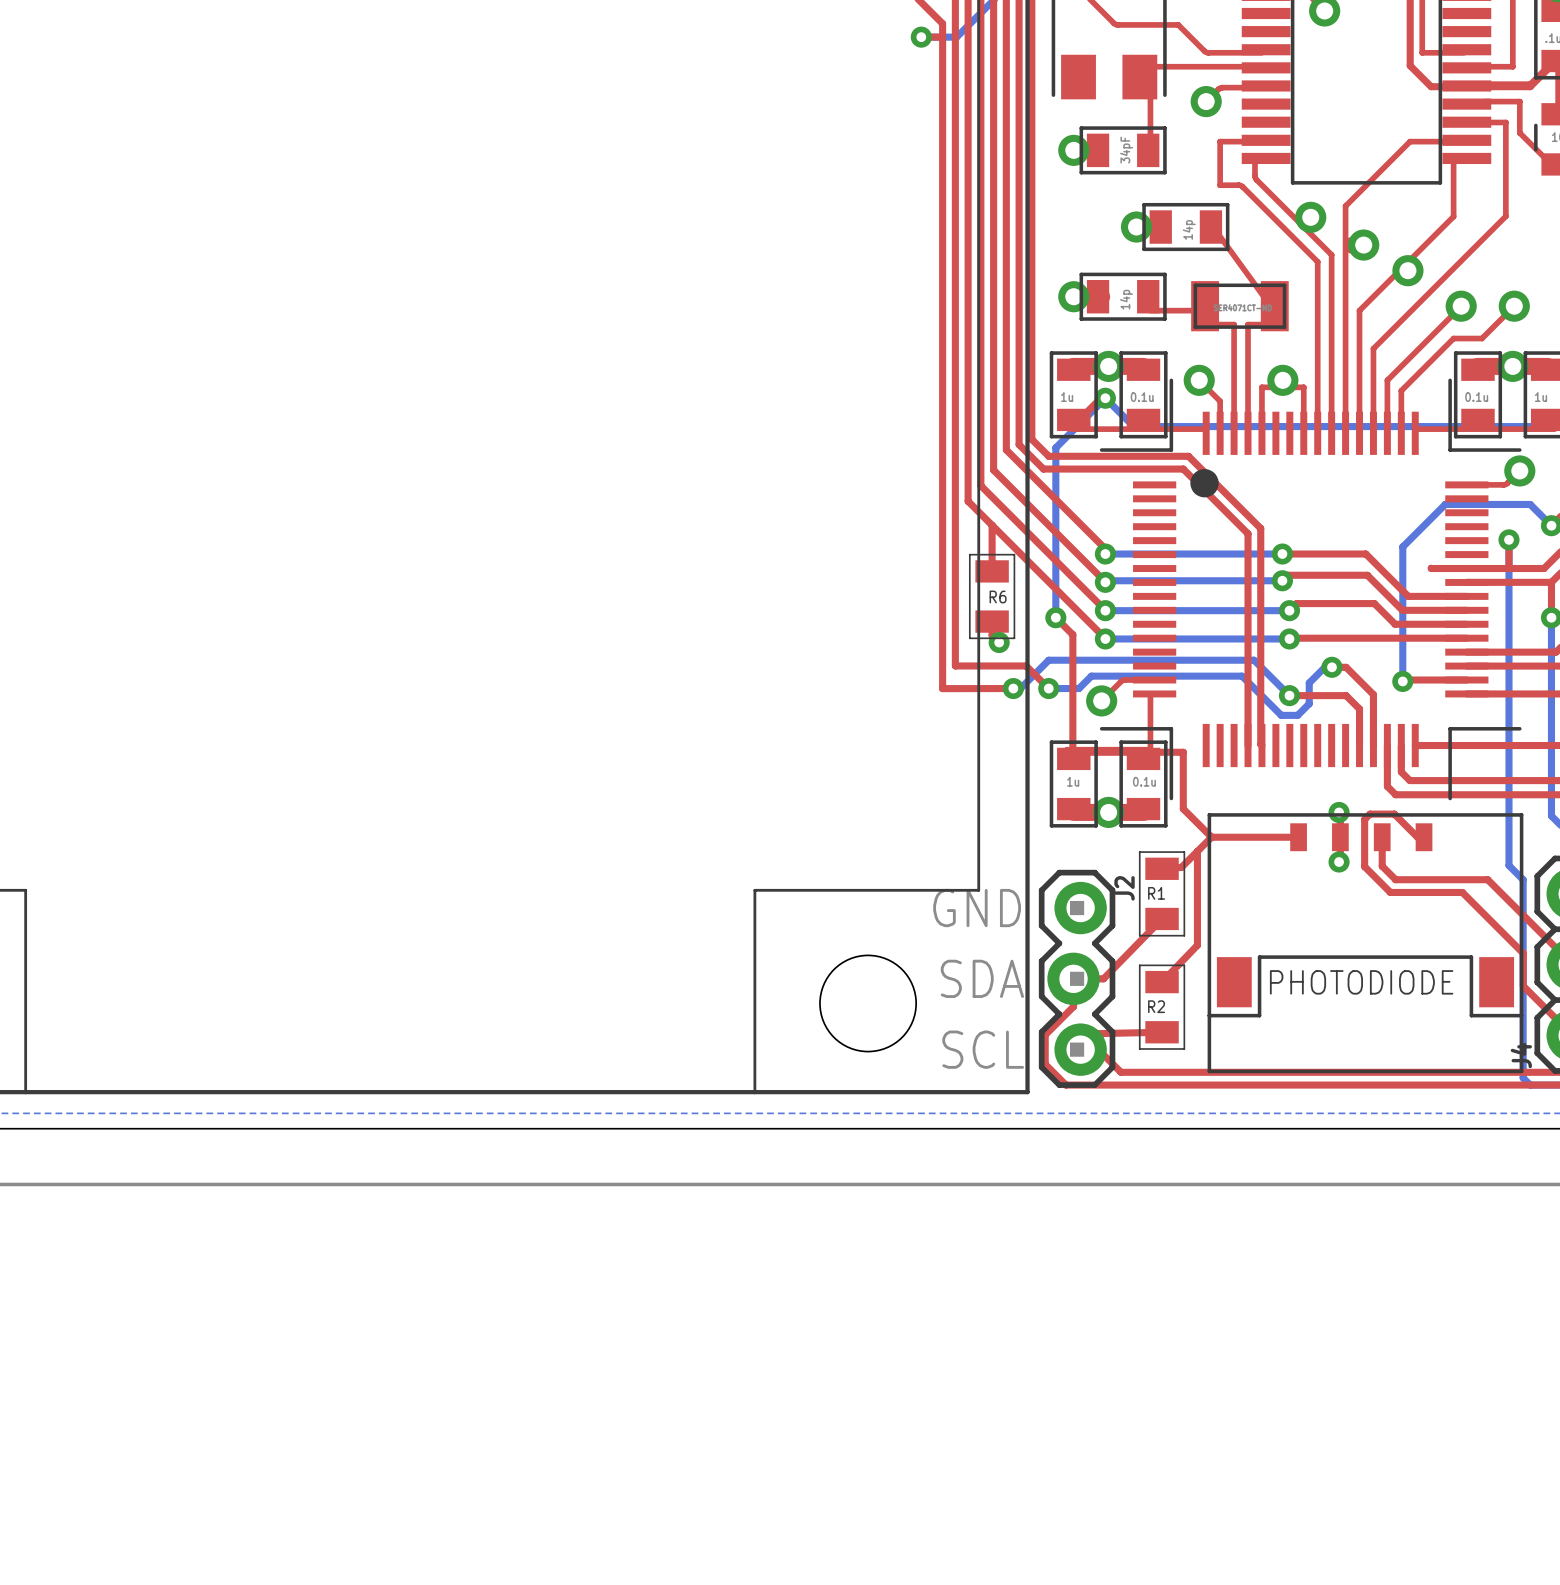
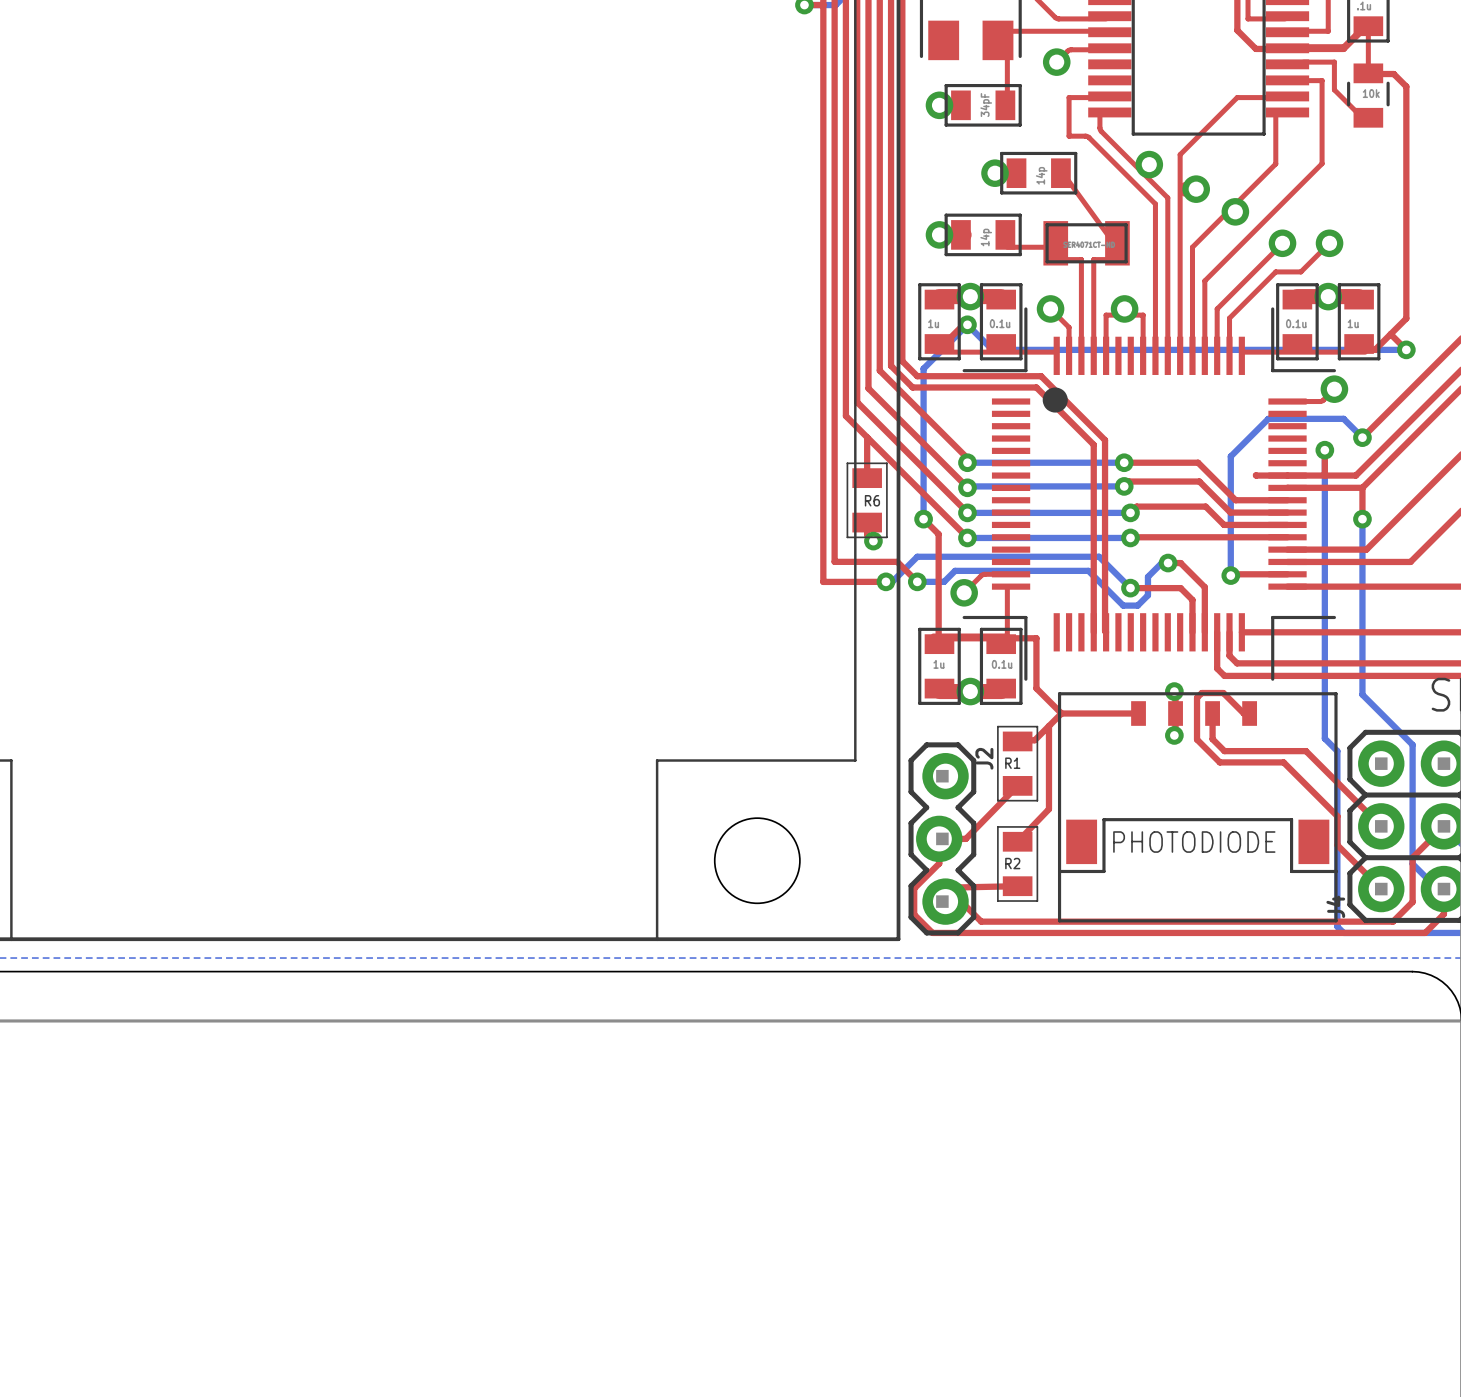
text: GND (977, 908) -> none
text: SDA (982, 978) -> none
text: SCL (983, 1049) -> none

